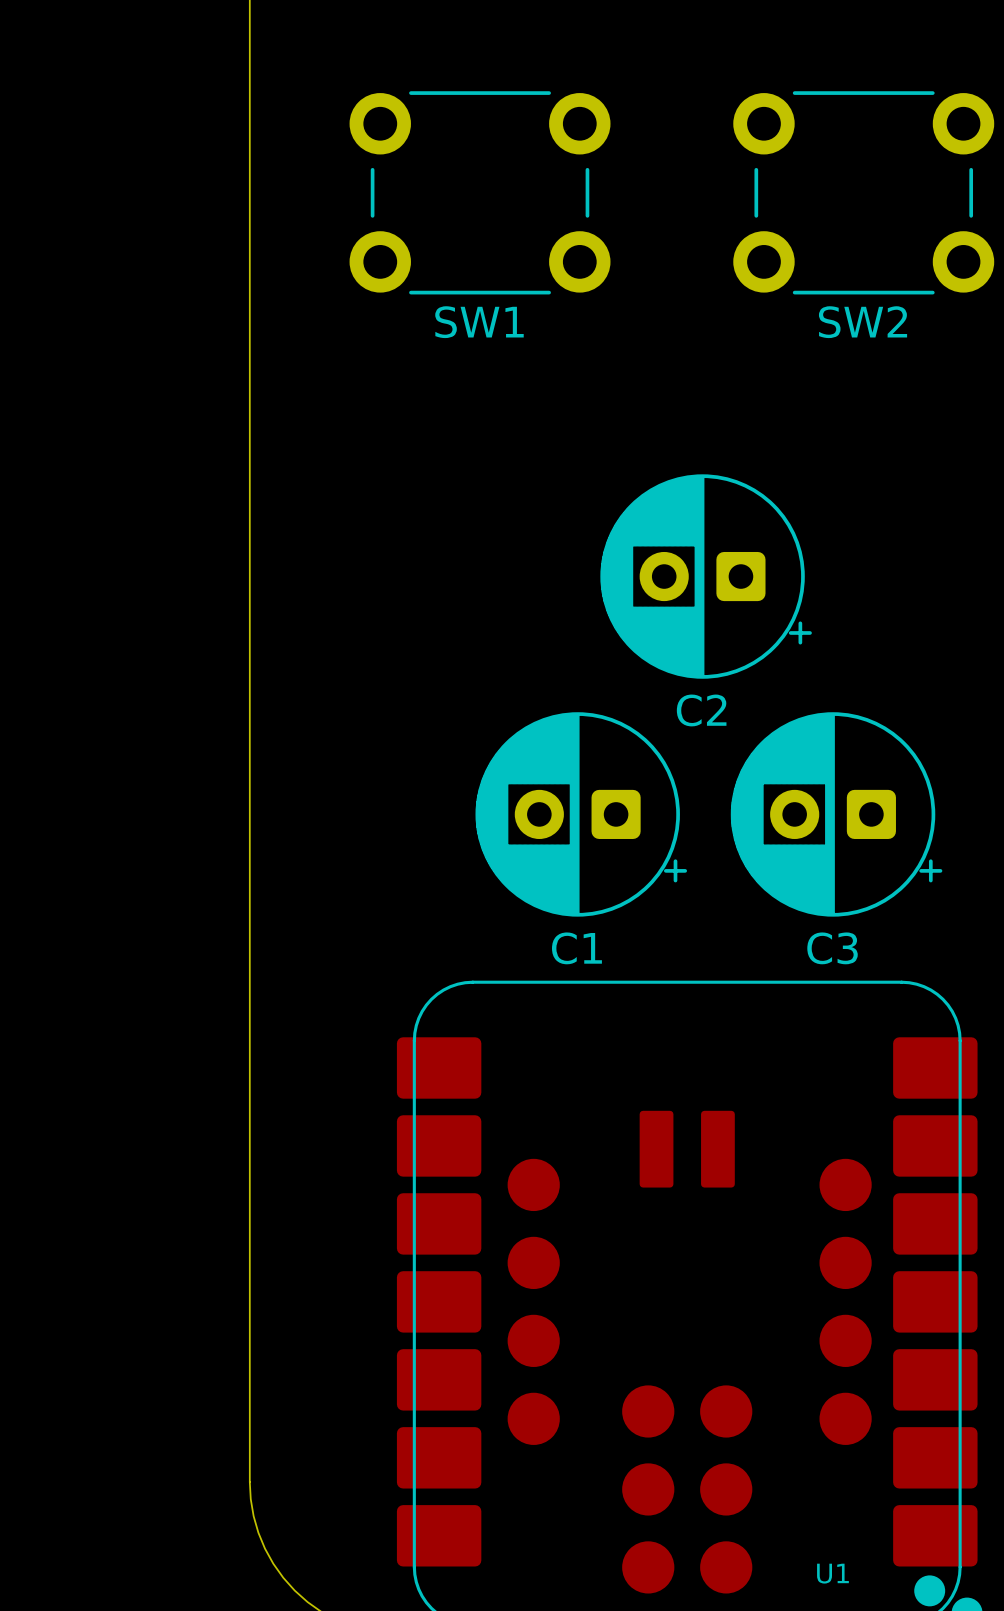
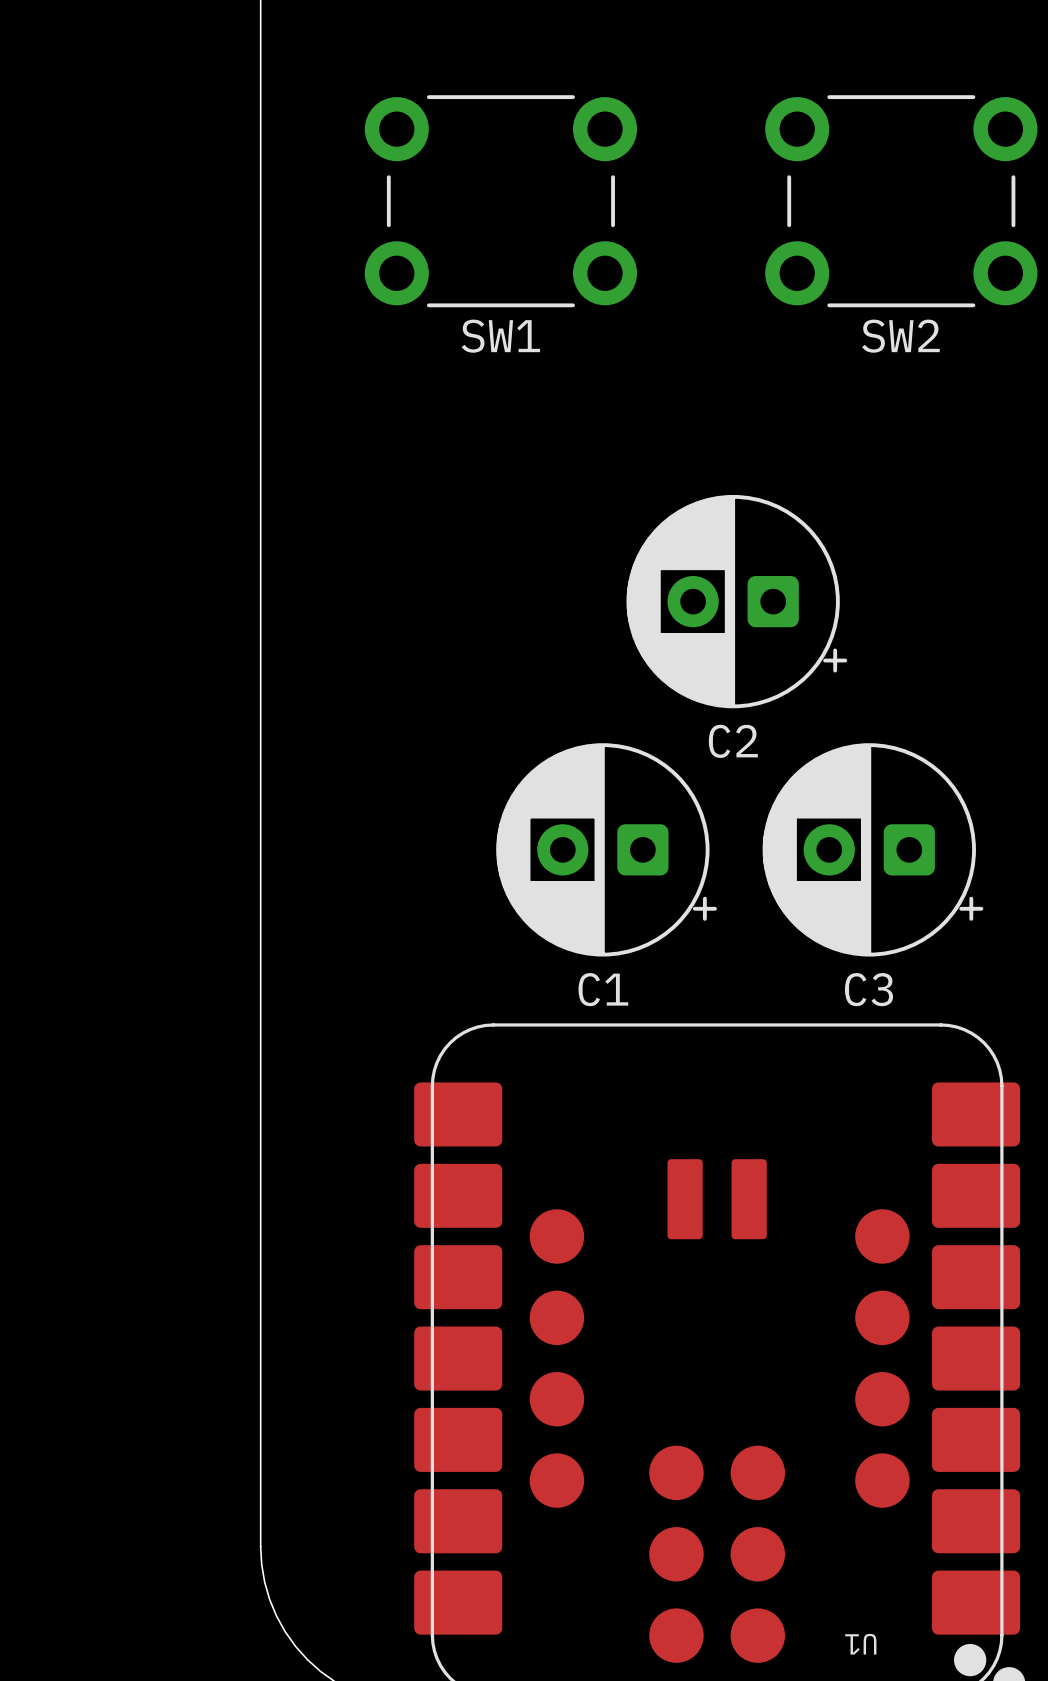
U1 name rotation: 0° (832, 1573) -> 180° (860, 1644)

